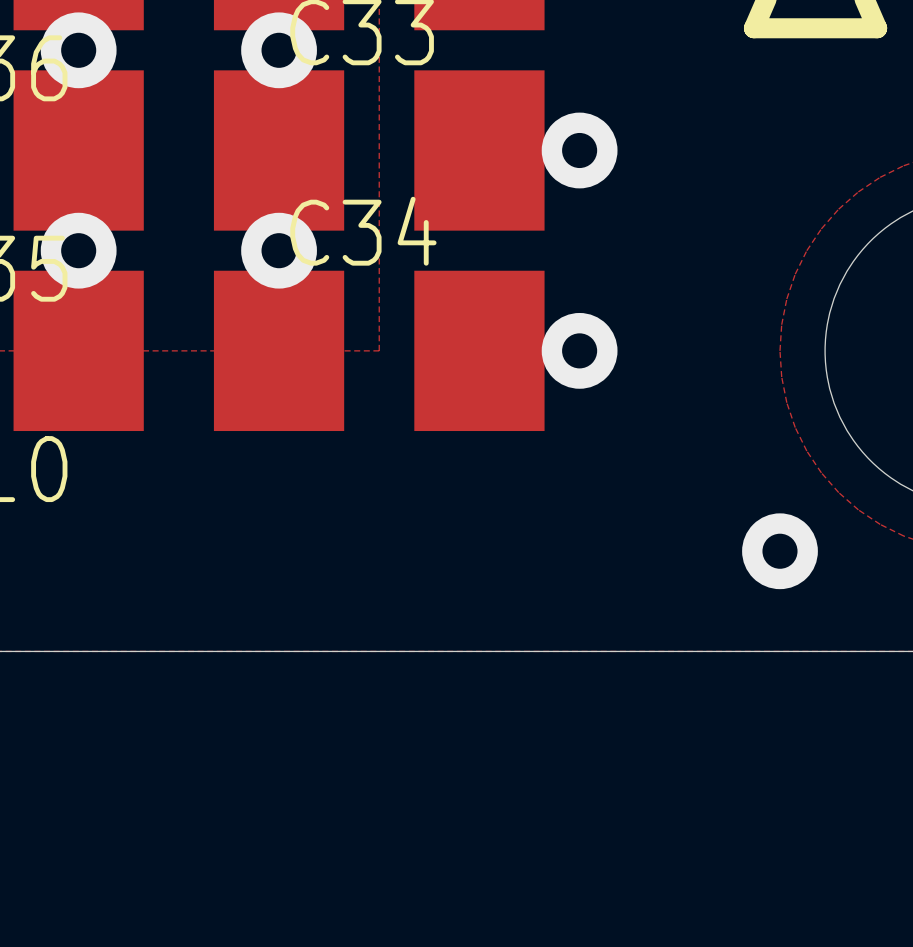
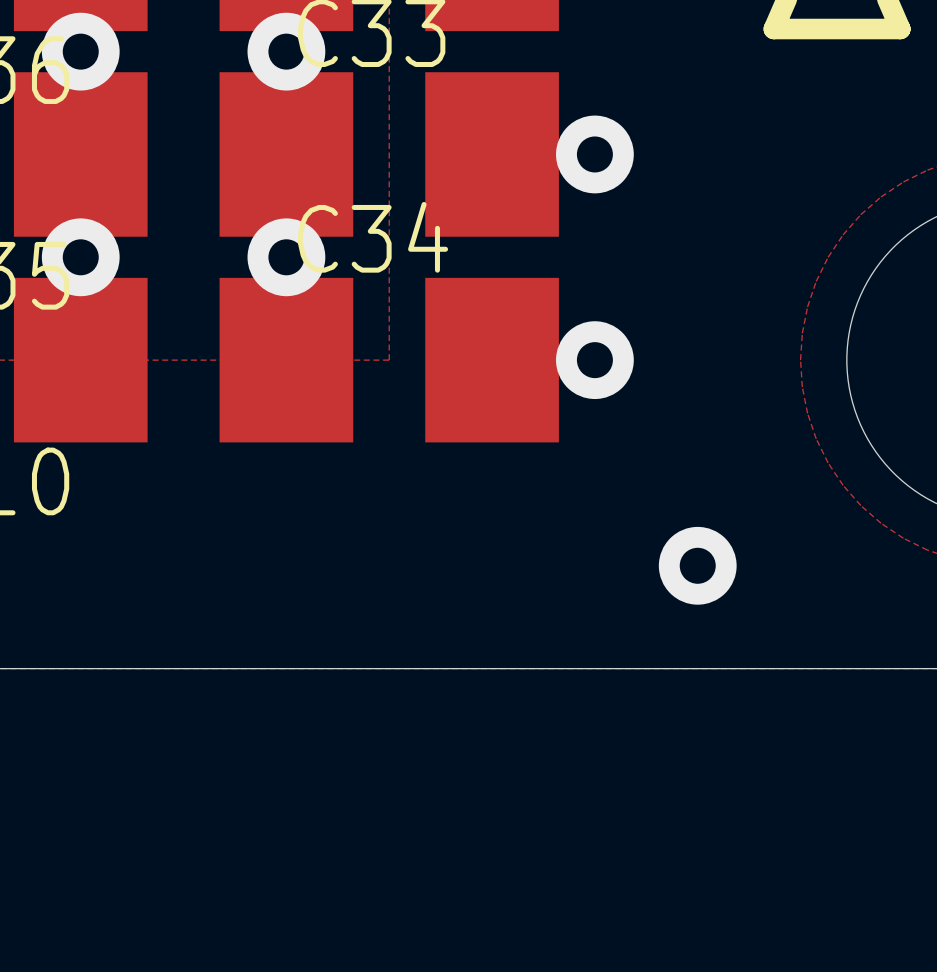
via position: (779, 551) -> (697, 565)

